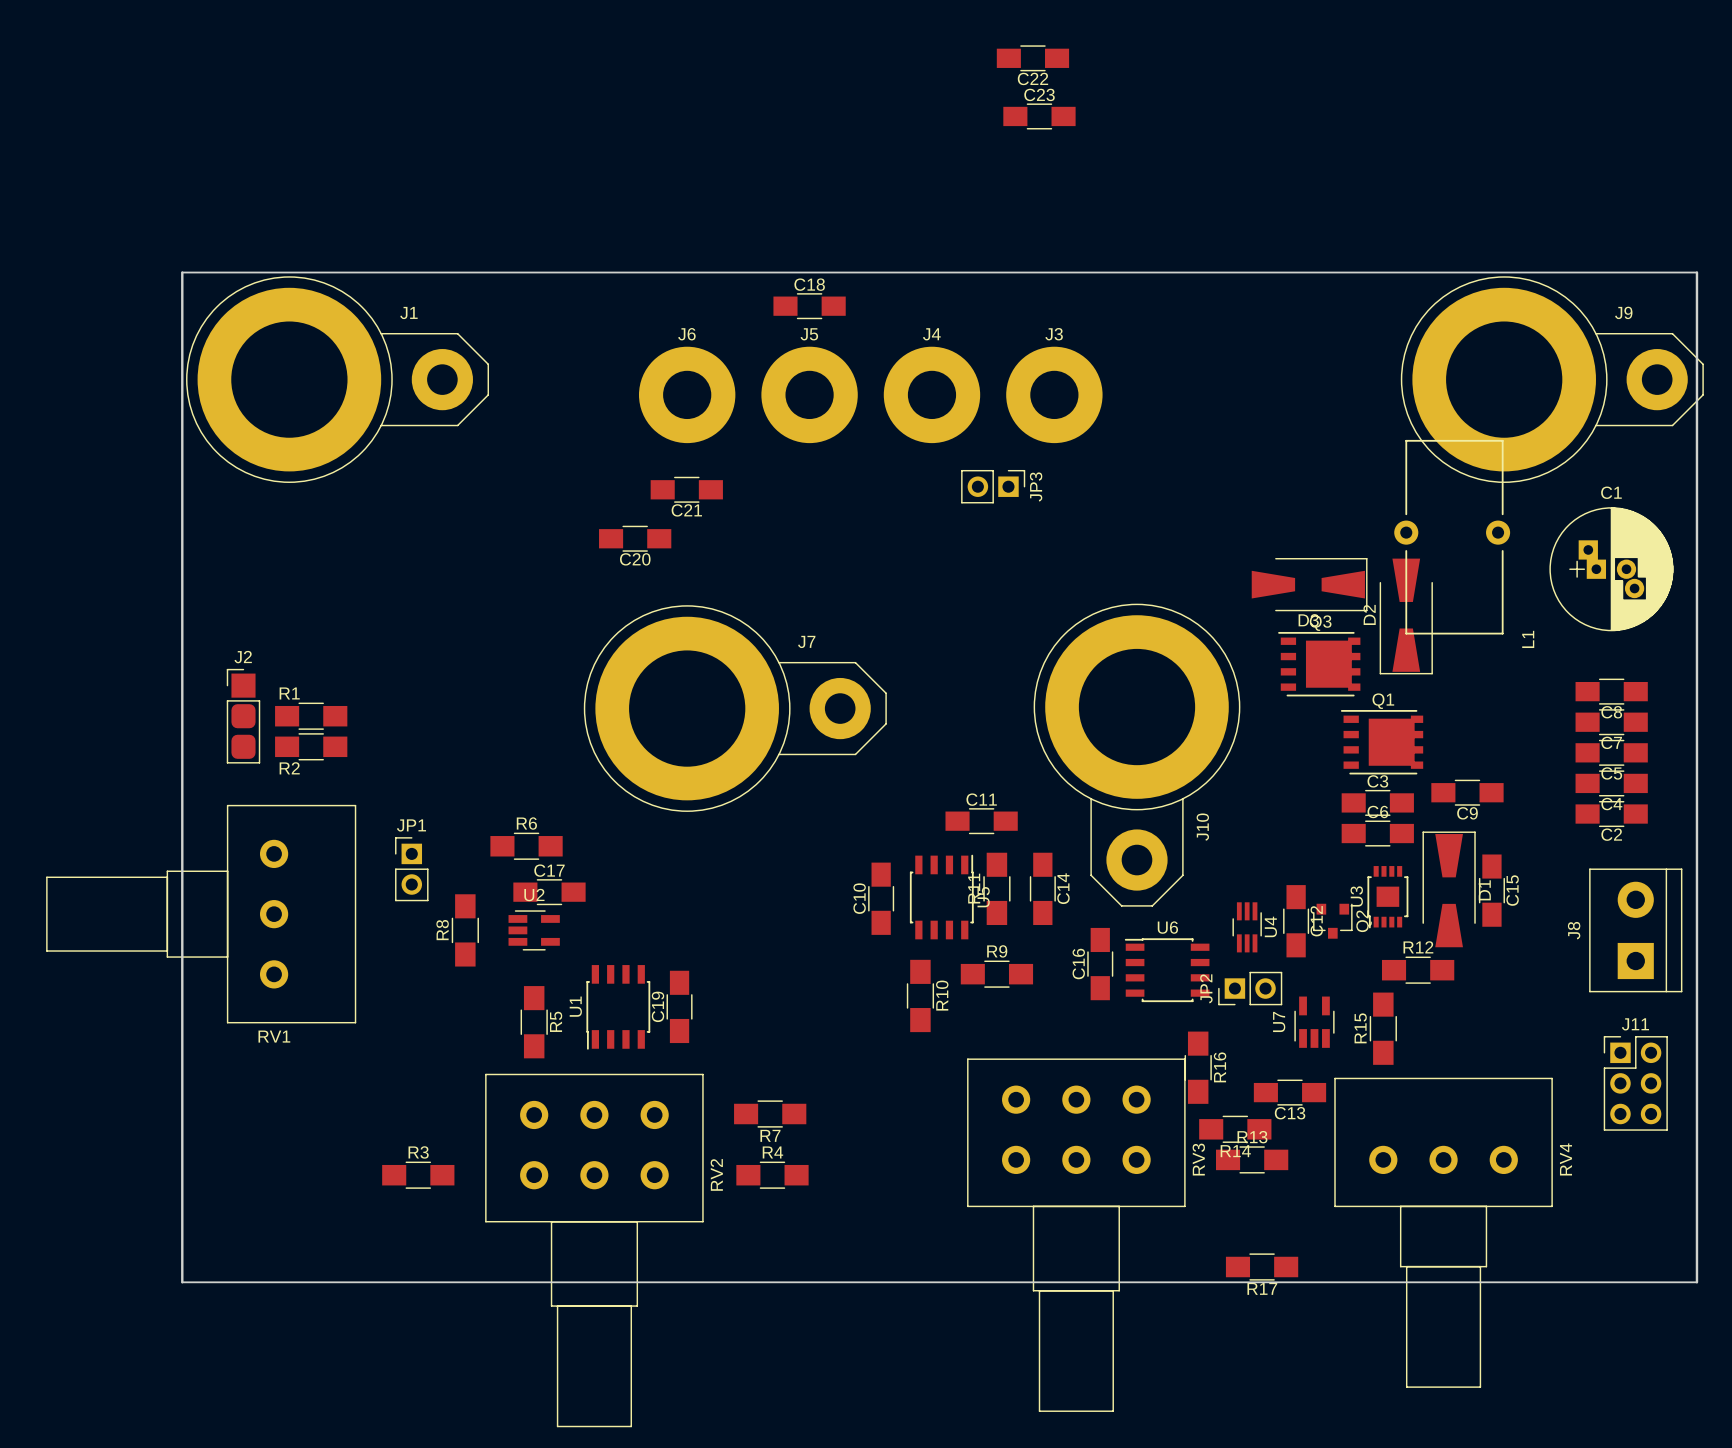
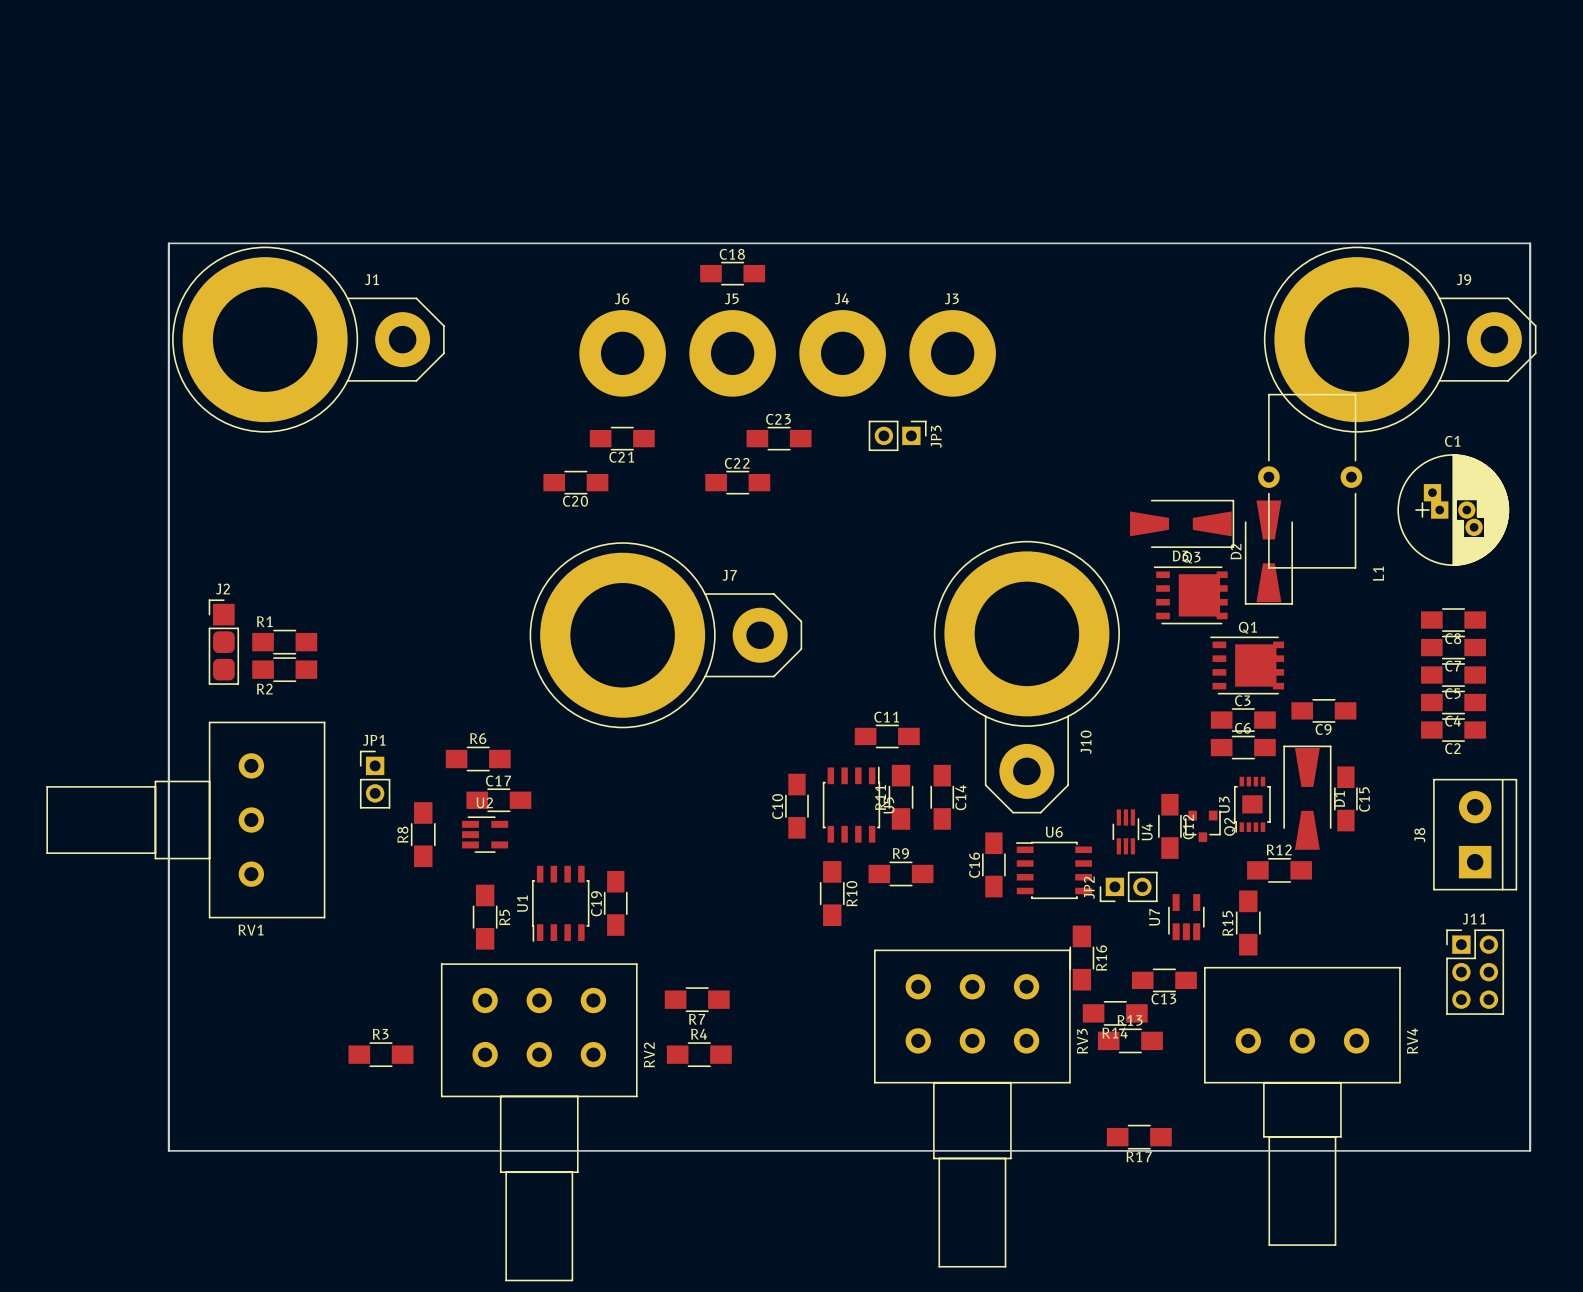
C22 position: (1032, 58) -> (737, 482)
C22 name position: C22 (1032, 78) -> C22 (737, 463)
C23 position: (1039, 116) -> (779, 438)

